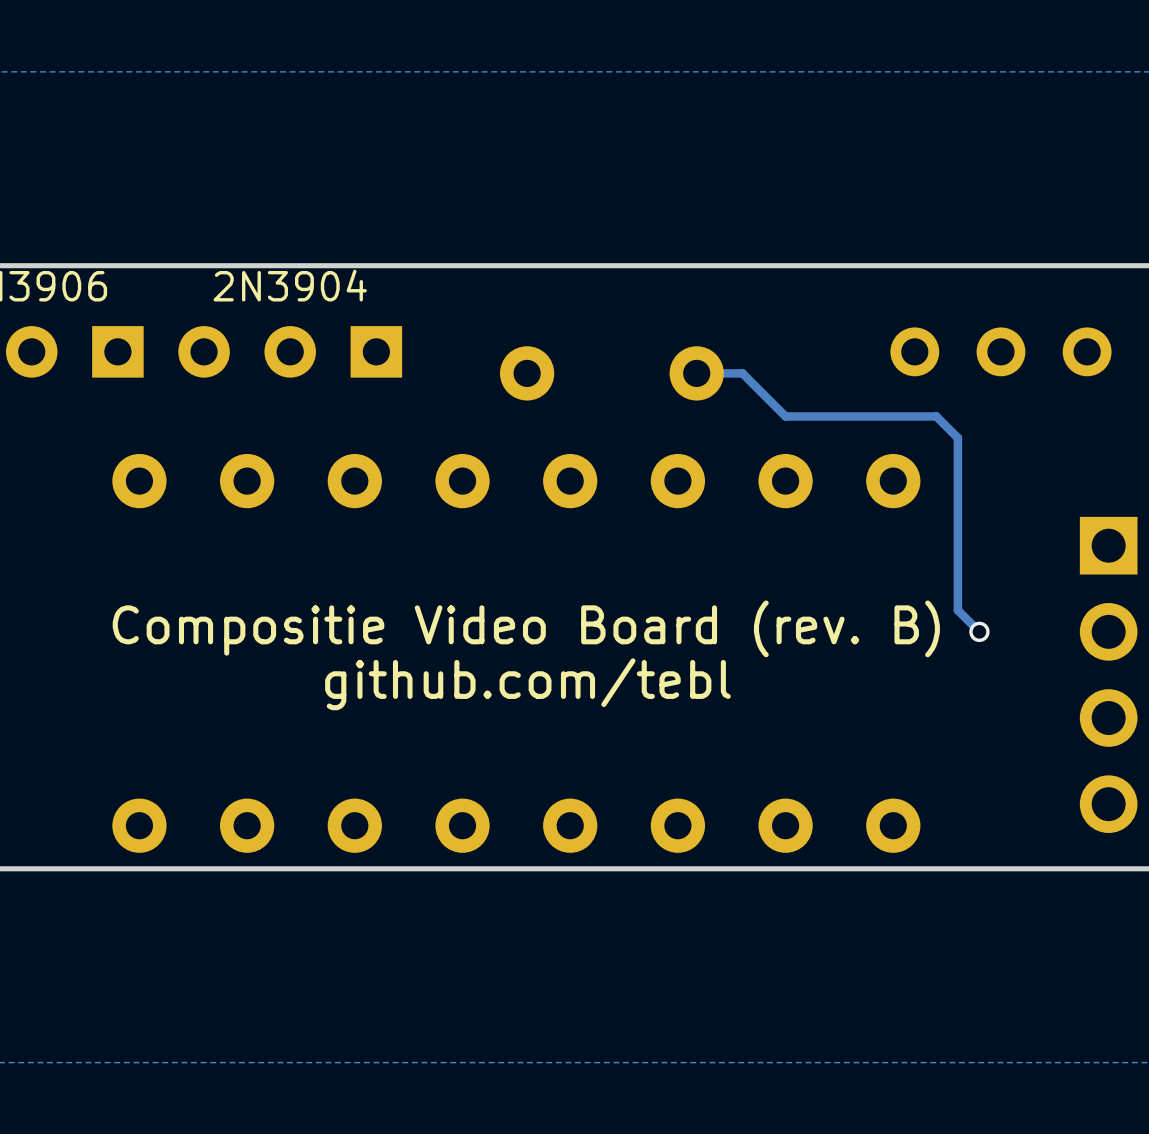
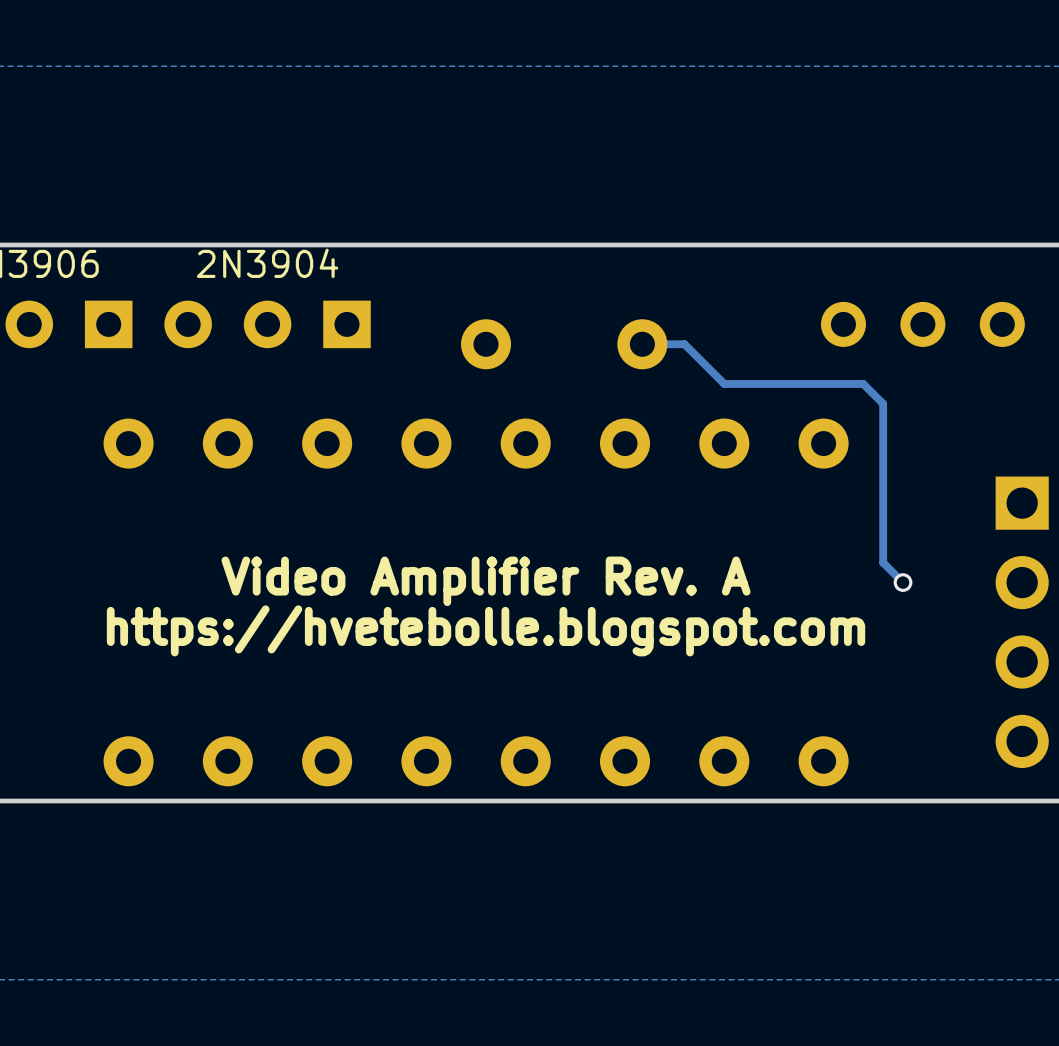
text: Compositie Video Board (rev. B) (526, 628) -> Video Amplifier Rev. A (486, 581)
text: github.com/tebl (527, 684) -> https://hvetebolle.blogspot.com (486, 630)

